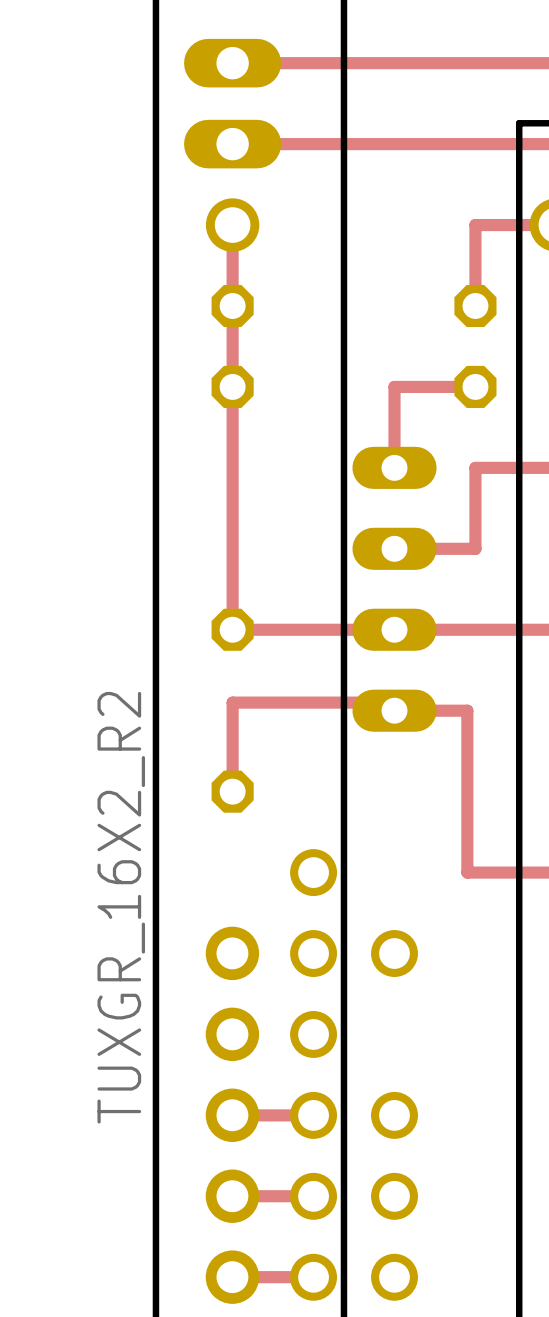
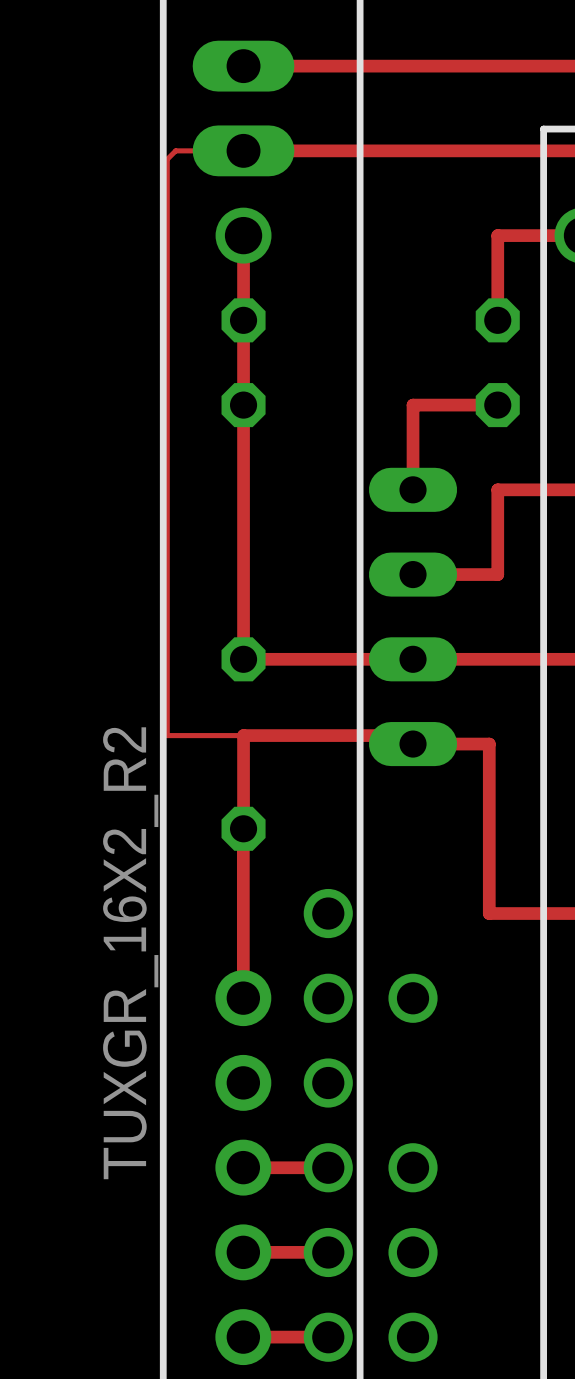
top track: none -> (243, 150) (175, 150) (167, 159) (167, 735) (243, 735)
top track: none -> (243, 828) (243, 998)

